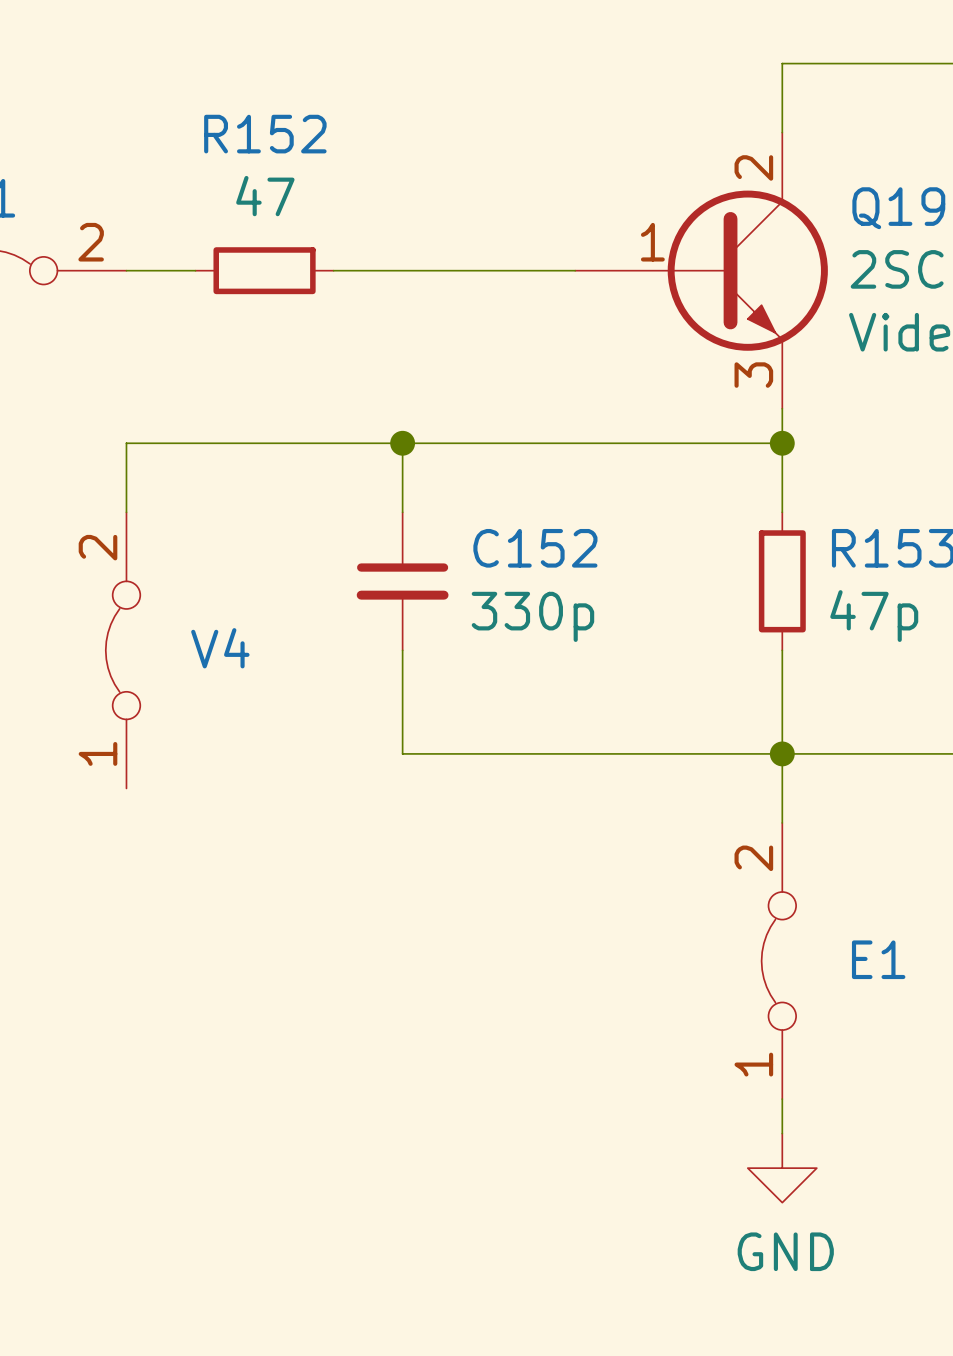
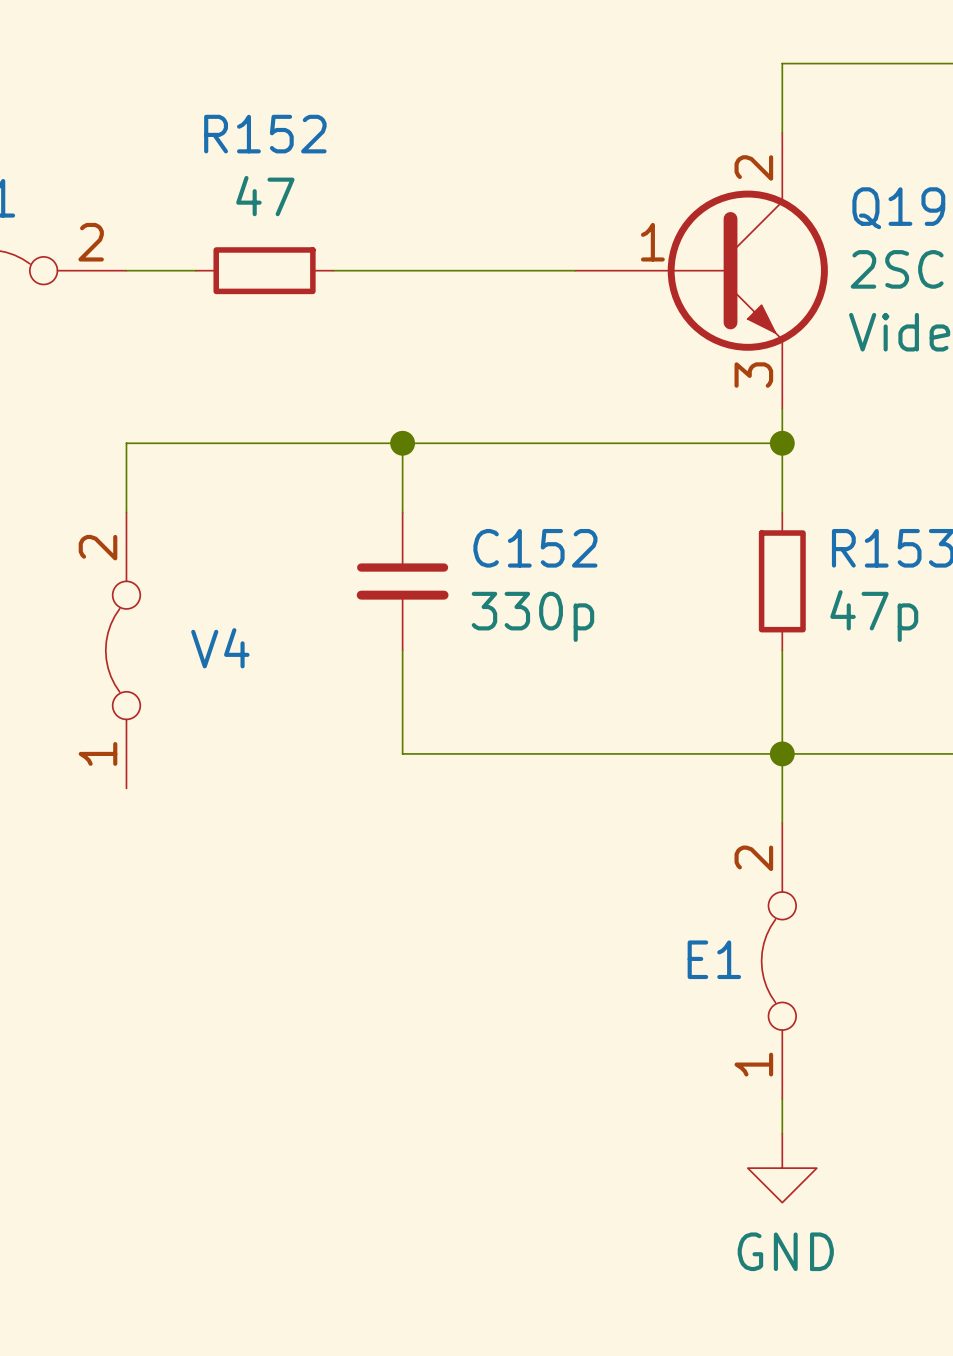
E1 name position: E1 (878, 959) -> E1 (714, 959)

